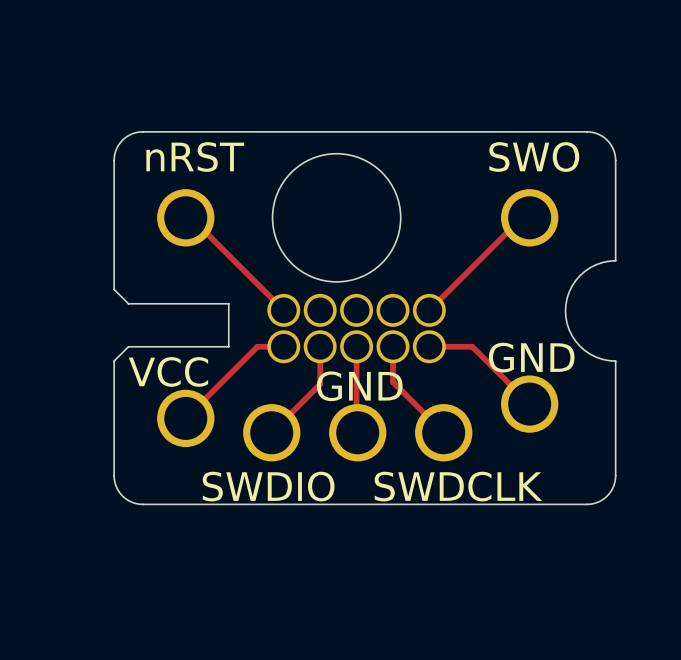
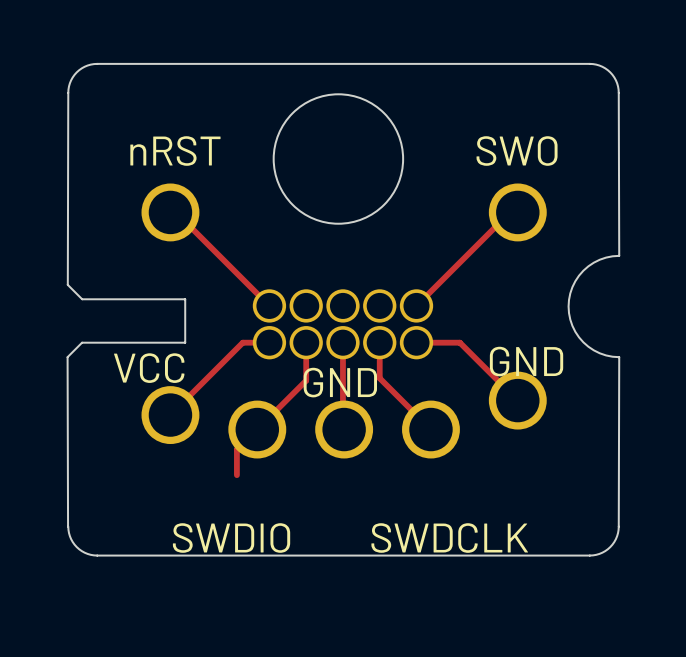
round board edge position: (336, 217) -> (338, 159)
board edge: (128, 303) (114, 289) (114, 160) (118, 145) (124, 138) (133, 133) (142, 131) (586, 131) (602, 136) (609, 142) (614, 151) (615, 260) (596, 264) (580, 275) (569, 291) (565, 310) (569, 330) (580, 346) (596, 357) (615, 361) (615, 478) (609, 493) (596, 502) (586, 504) (142, 504) (133, 502) (120, 493) (115, 485) (114, 475) (114, 361) (128, 346) -> (112, 299) (82, 299) (67, 284) (68, 89) (72, 77) (84, 66) (97, 63) (589, 63) (605, 68) (615, 80) (618, 92) (619, 255) (599, 259) (583, 270) (572, 287) (568, 306) (572, 325) (583, 342) (599, 353) (619, 357) (618, 529) (614, 542) (607, 549) (599, 553) (589, 555) (97, 555) (84, 552) (76, 547) (69, 536) (68, 526)
board edge: (200, 303) (228, 303) (228, 346) (200, 346) -> (185, 299) (185, 342)
board edge: none -> (112, 342) (82, 342) (67, 357) (68, 526)
text position: GND (531, 357) -> GND (526, 361)
track: none -> (257, 429) (236, 449) (236, 475)
text position: SWDIO (268, 486) -> SWDIO (231, 538)
text position: SWDCLK (458, 486) -> SWDCLK (449, 538)

